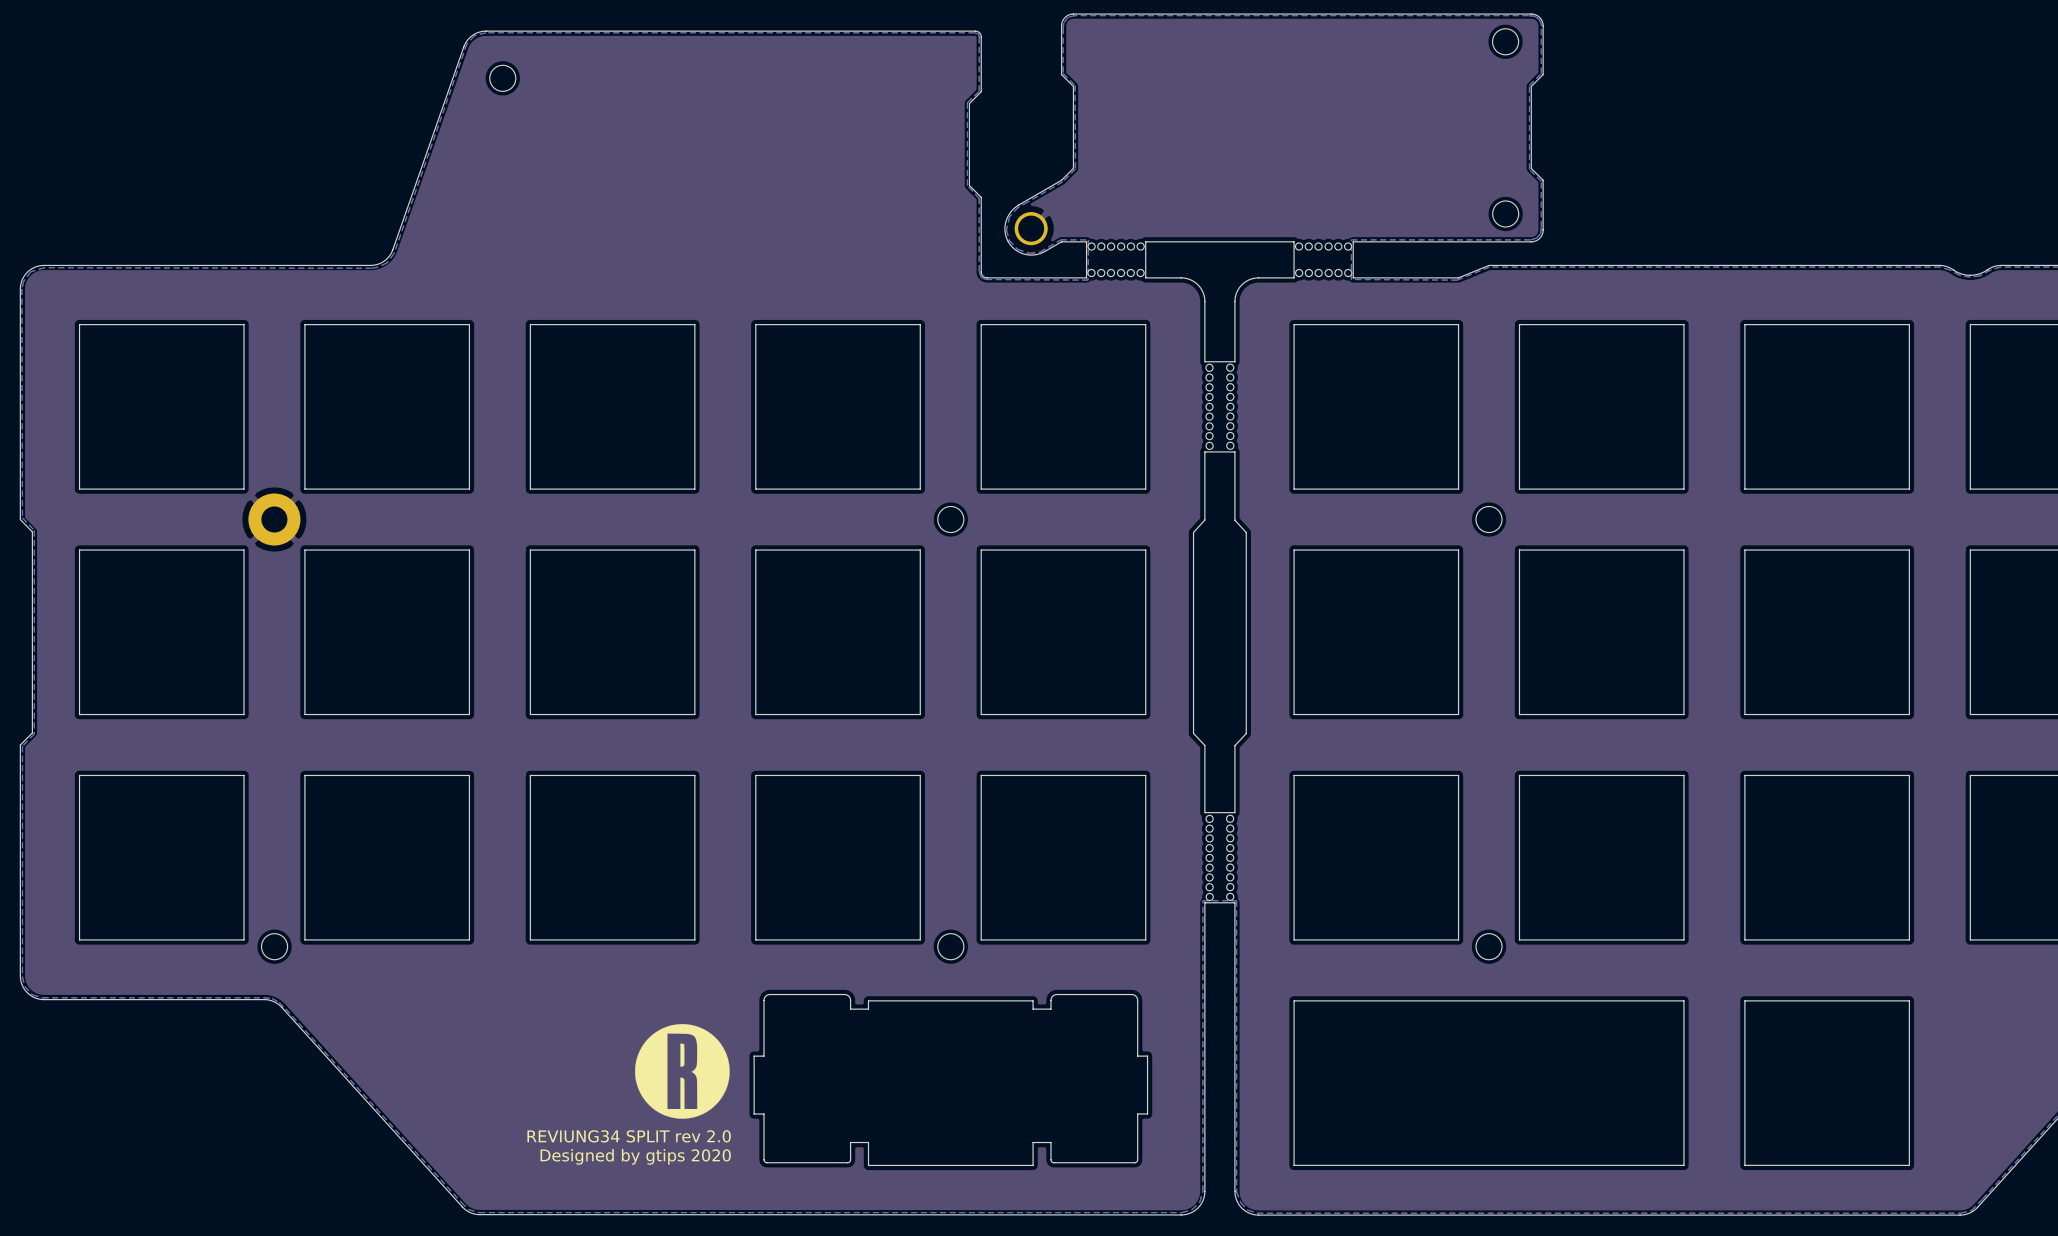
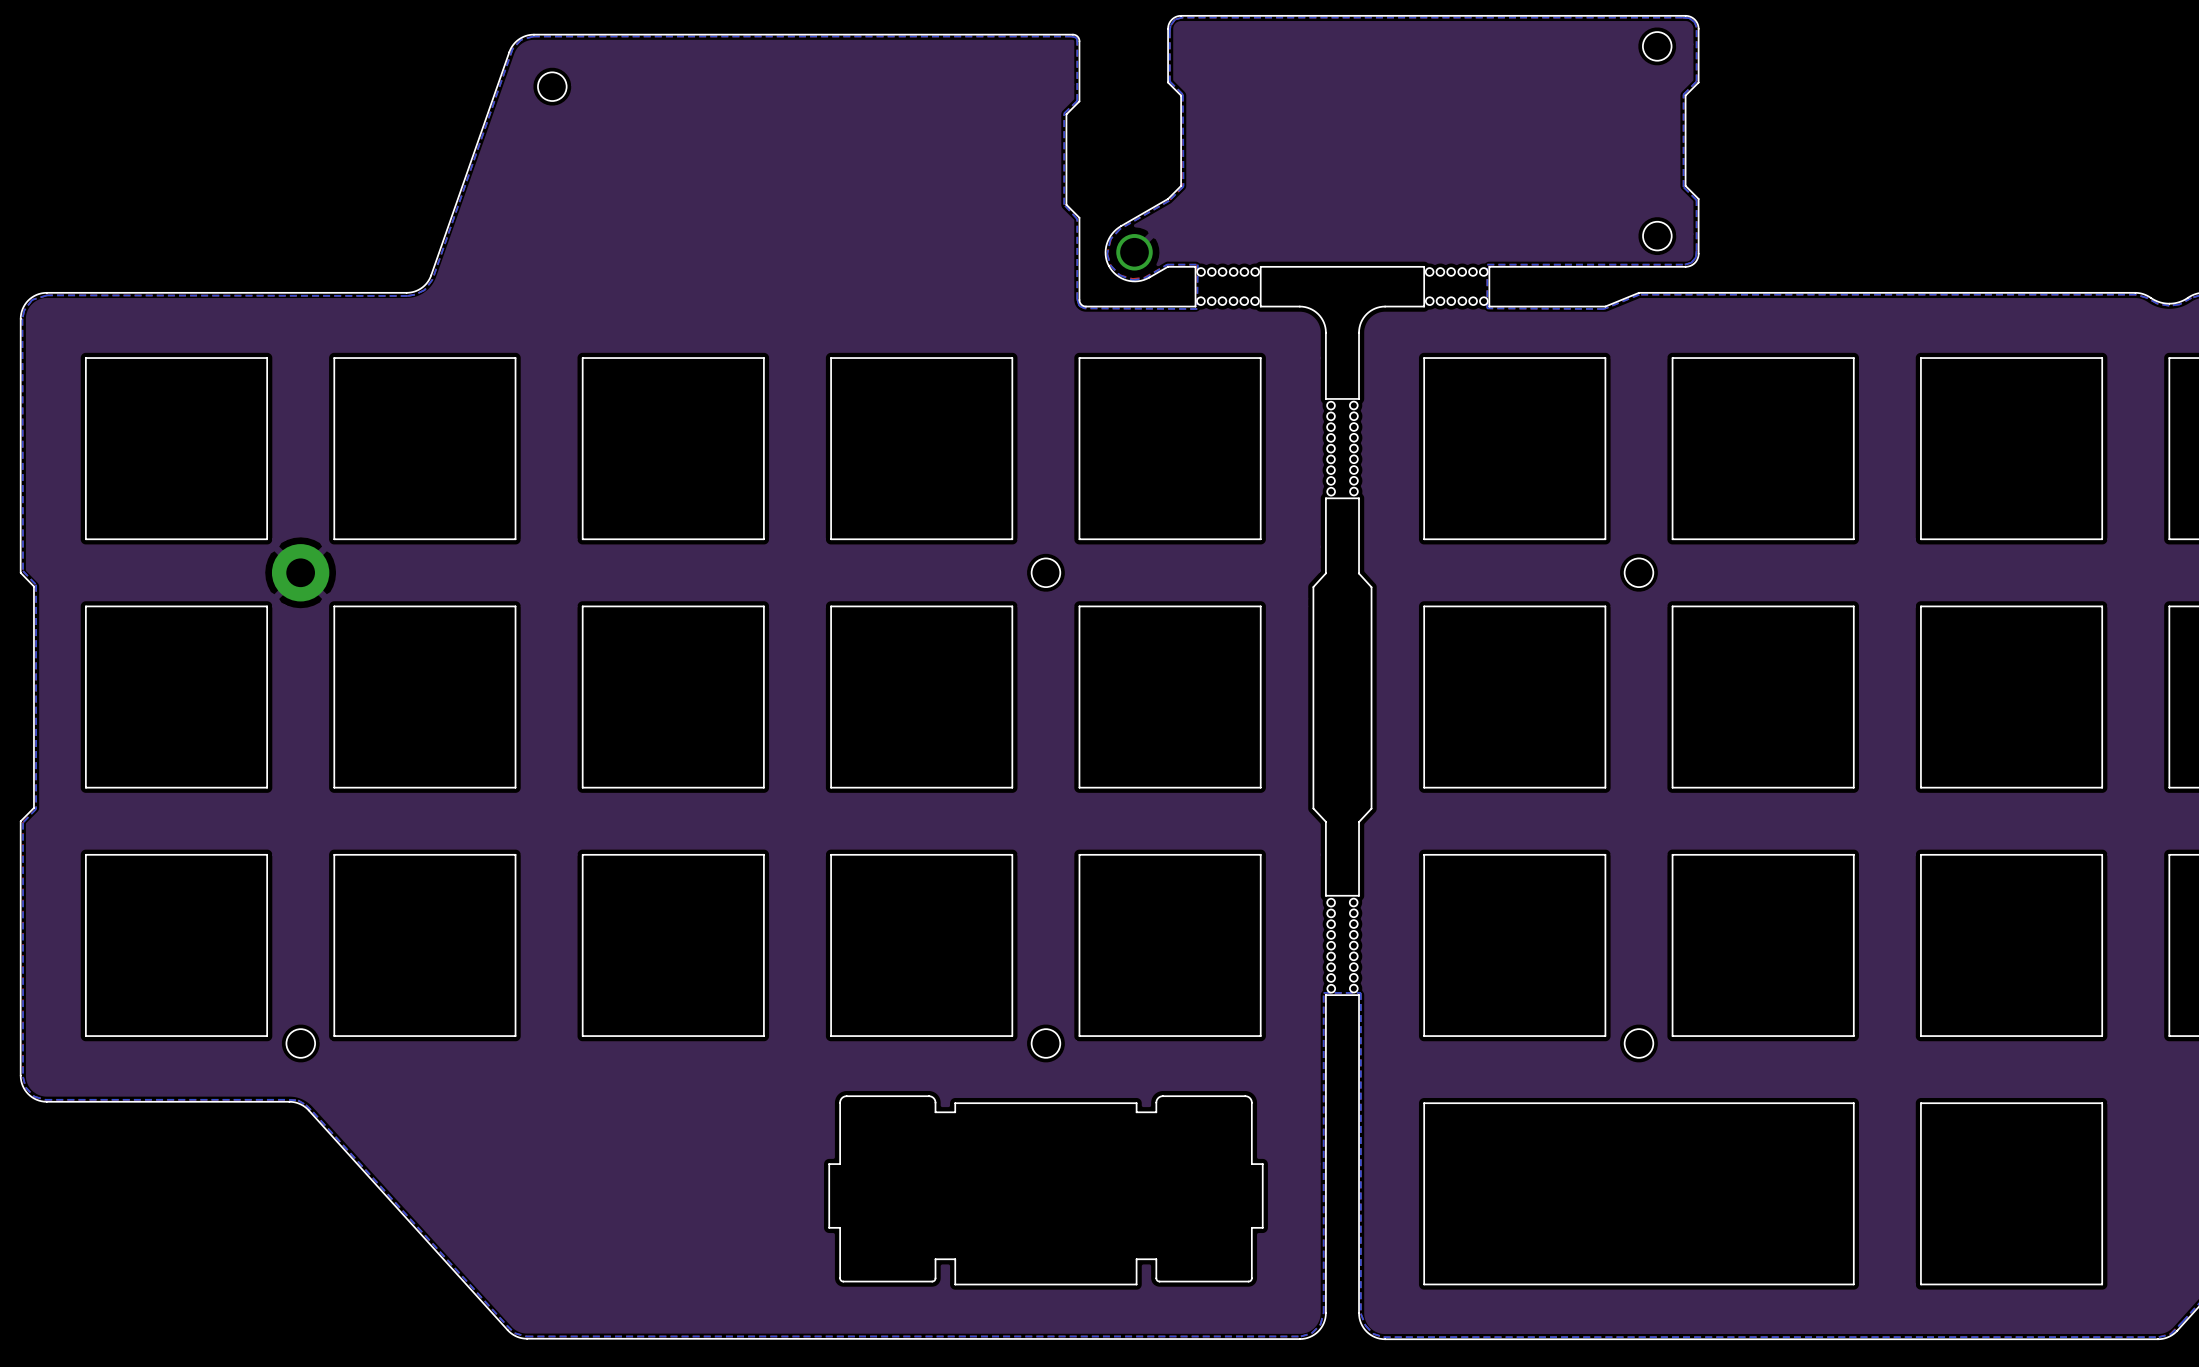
drawing: [635, 1024, 730, 1119] -> none
text: REVIUNG34 SPLIT rev 2.0 (629, 1136) -> none
text: Designed by gtips 2020 (635, 1156) -> none

